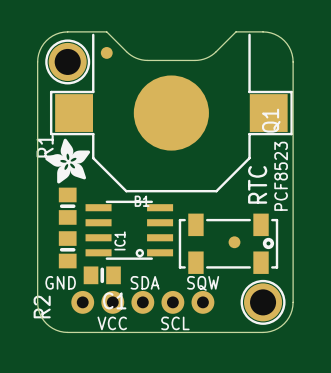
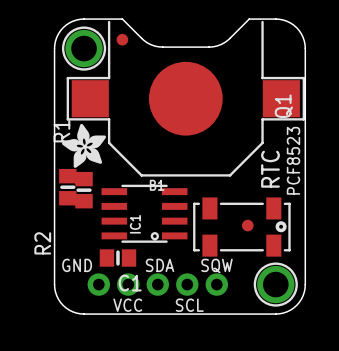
R2 position: (67, 249) -> (67, 187)

